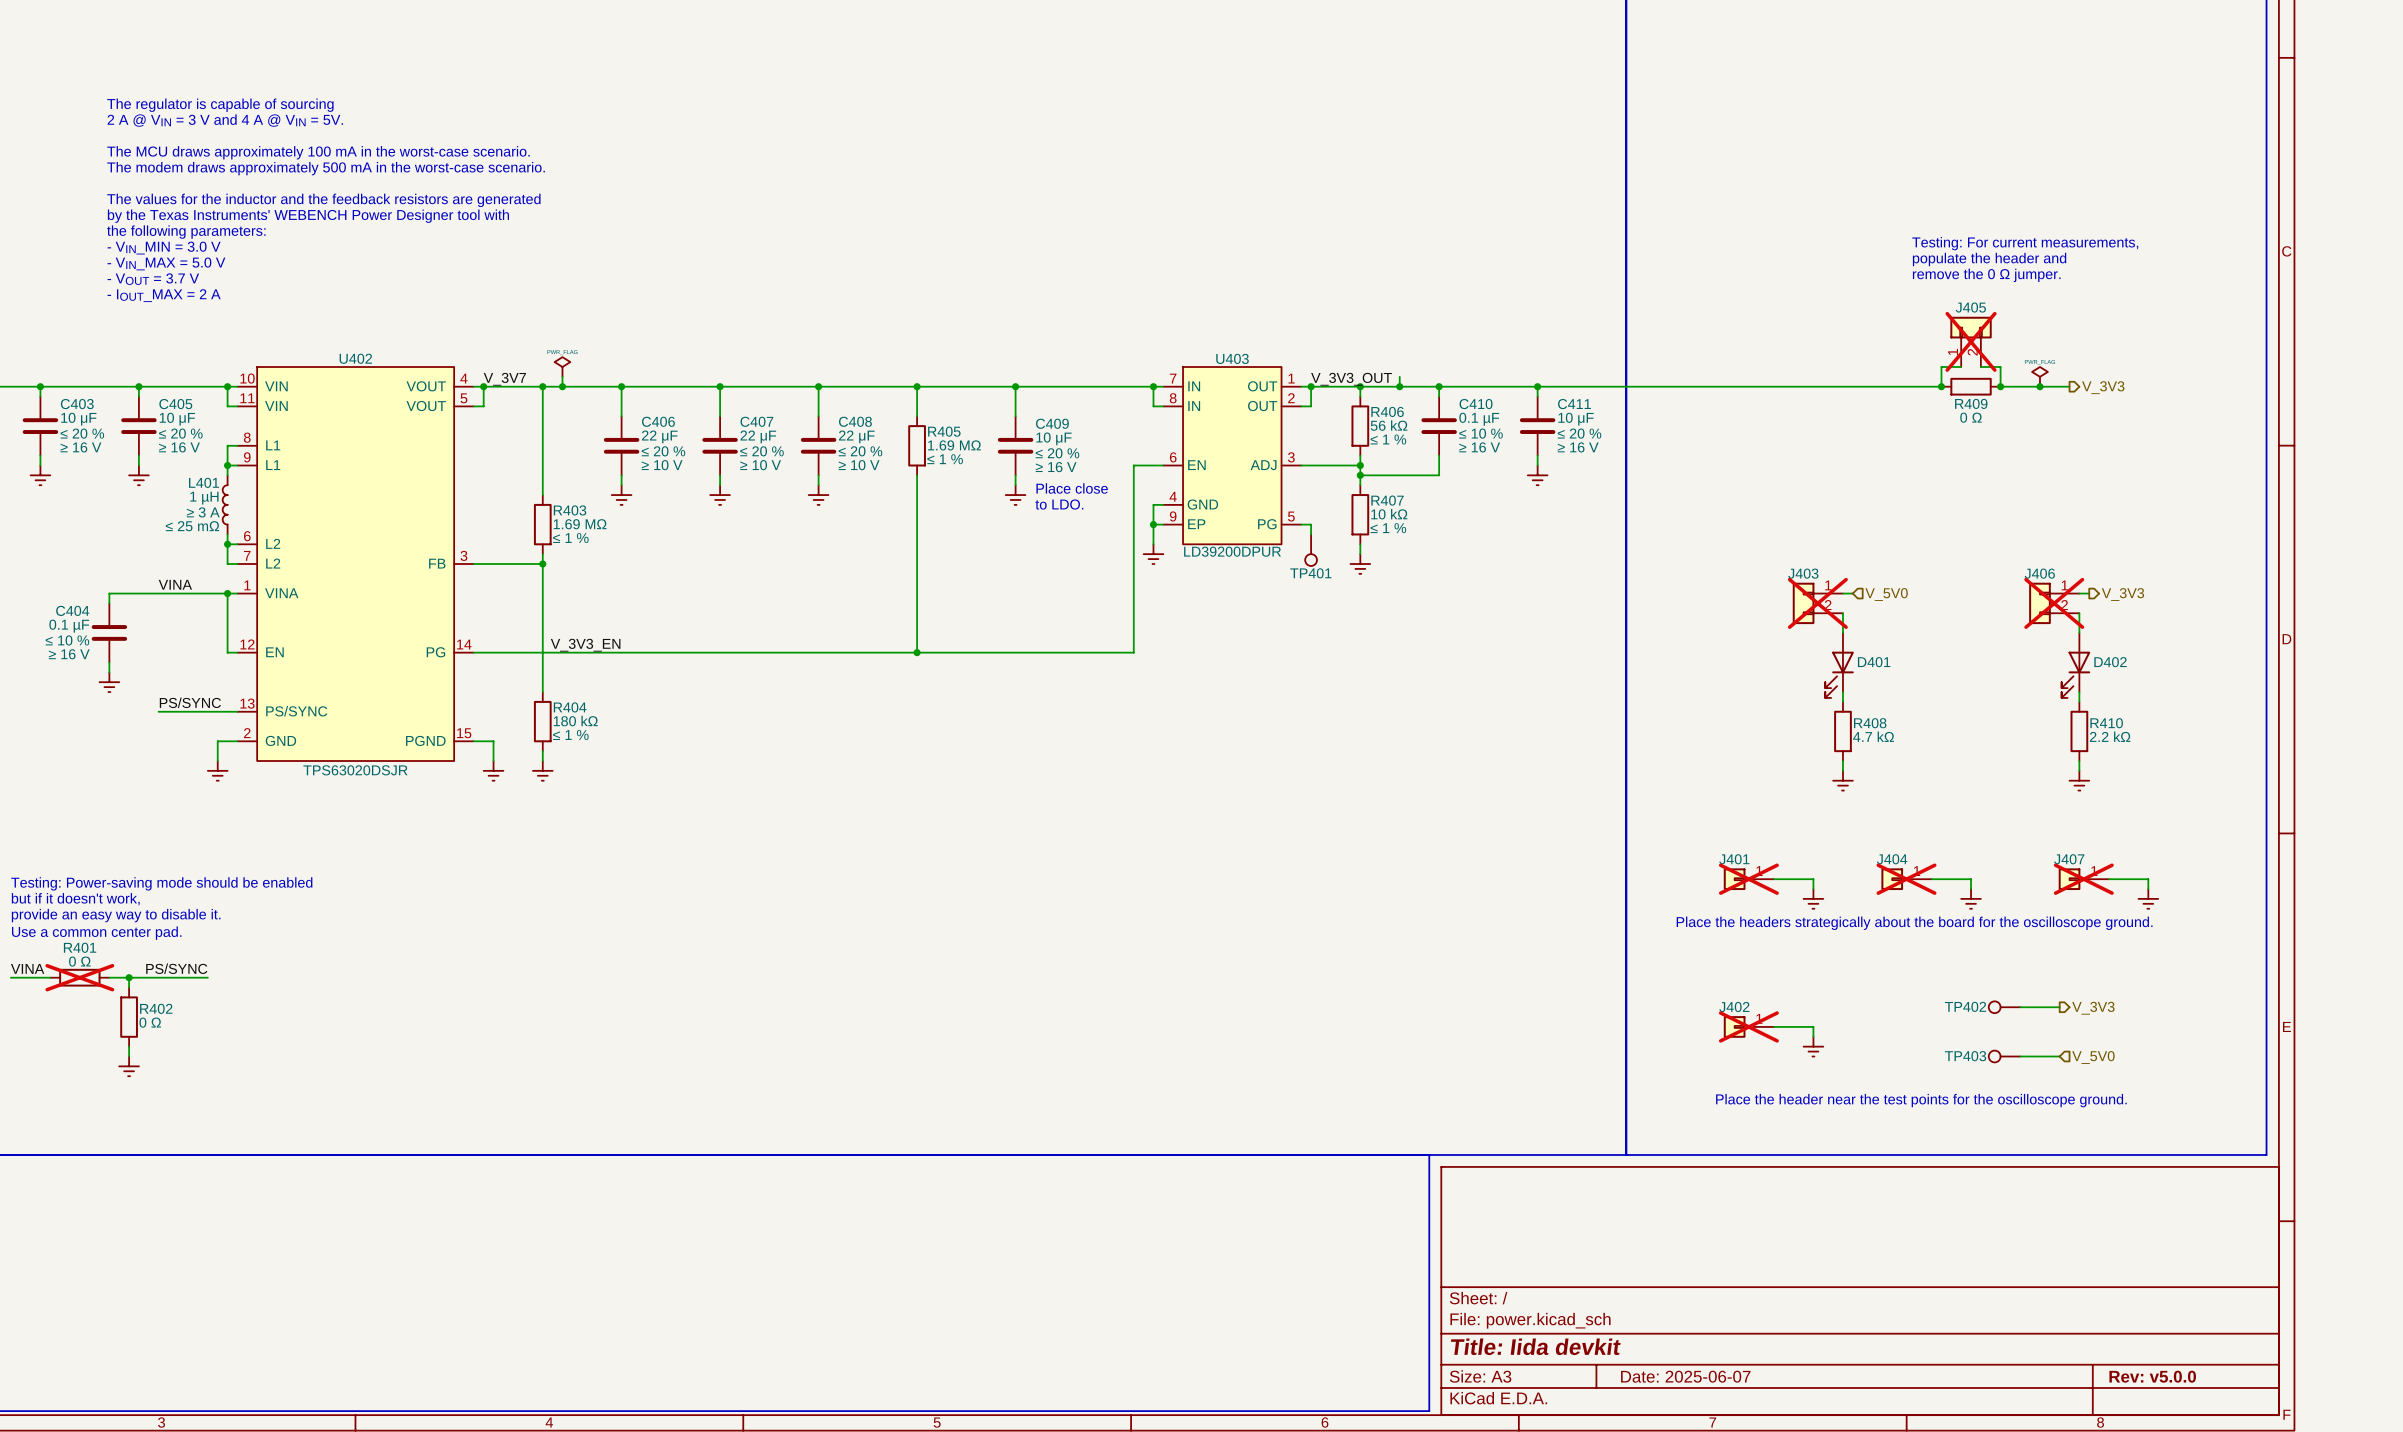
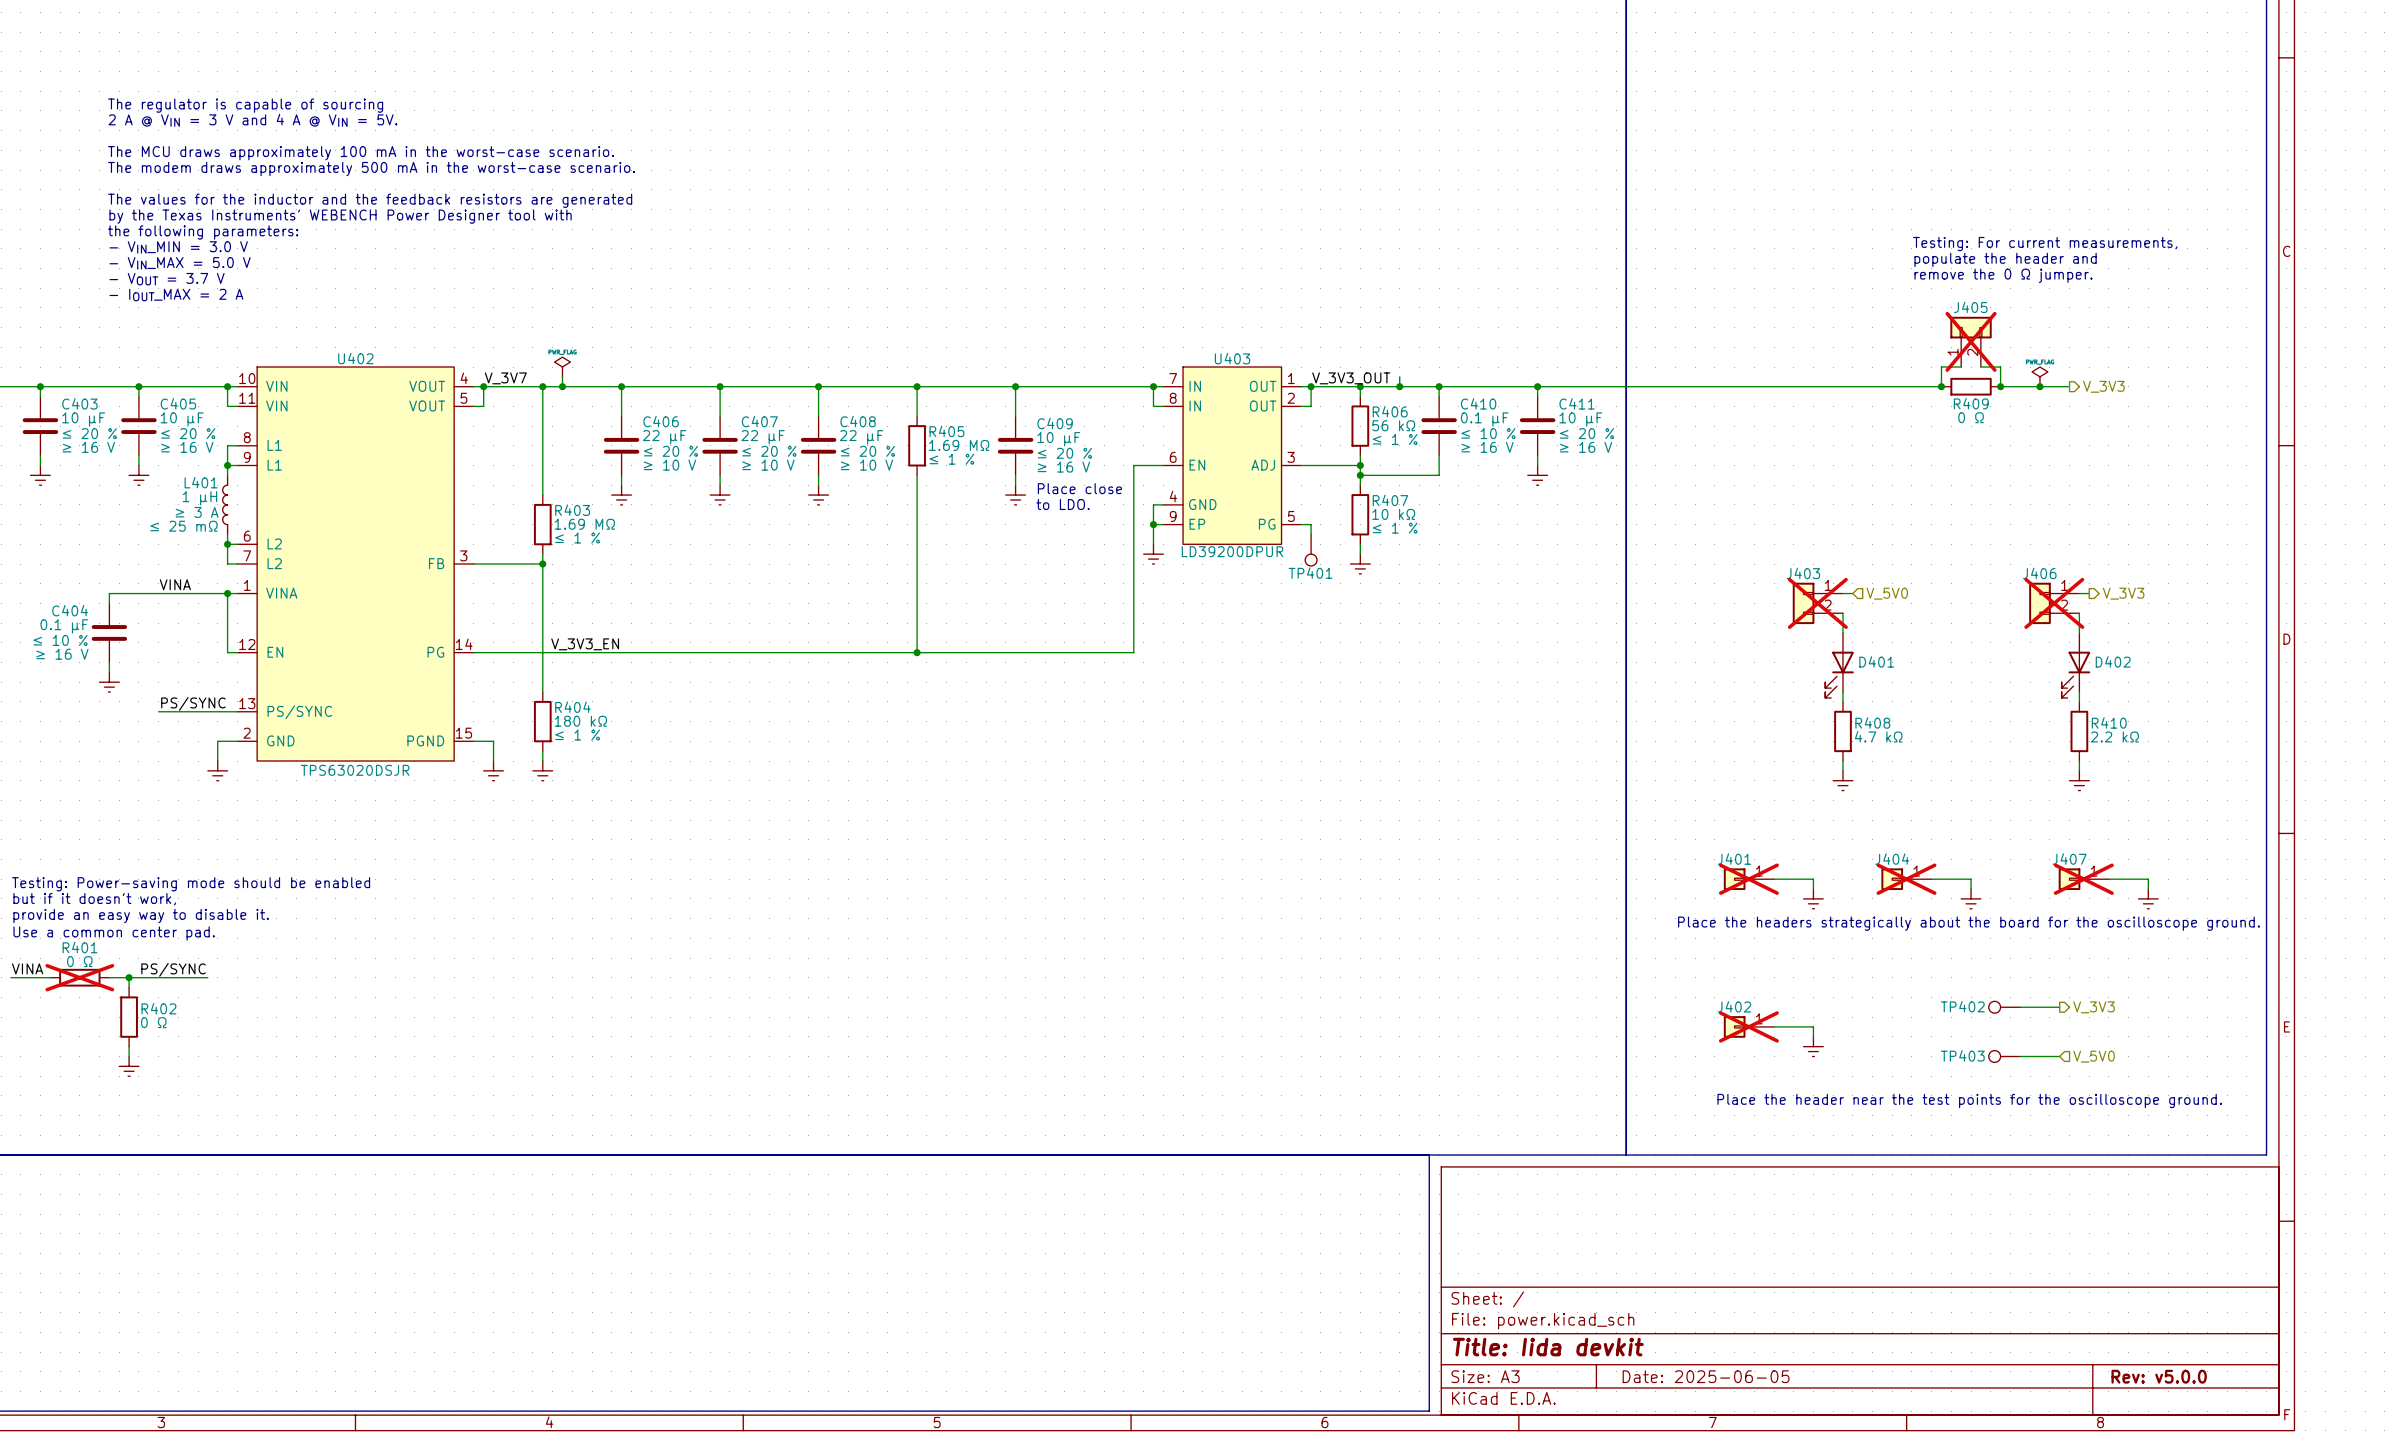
title block: Date: 2025-06-07 (1685, 1376) -> Date: 2025-06-05 (1706, 1376)

